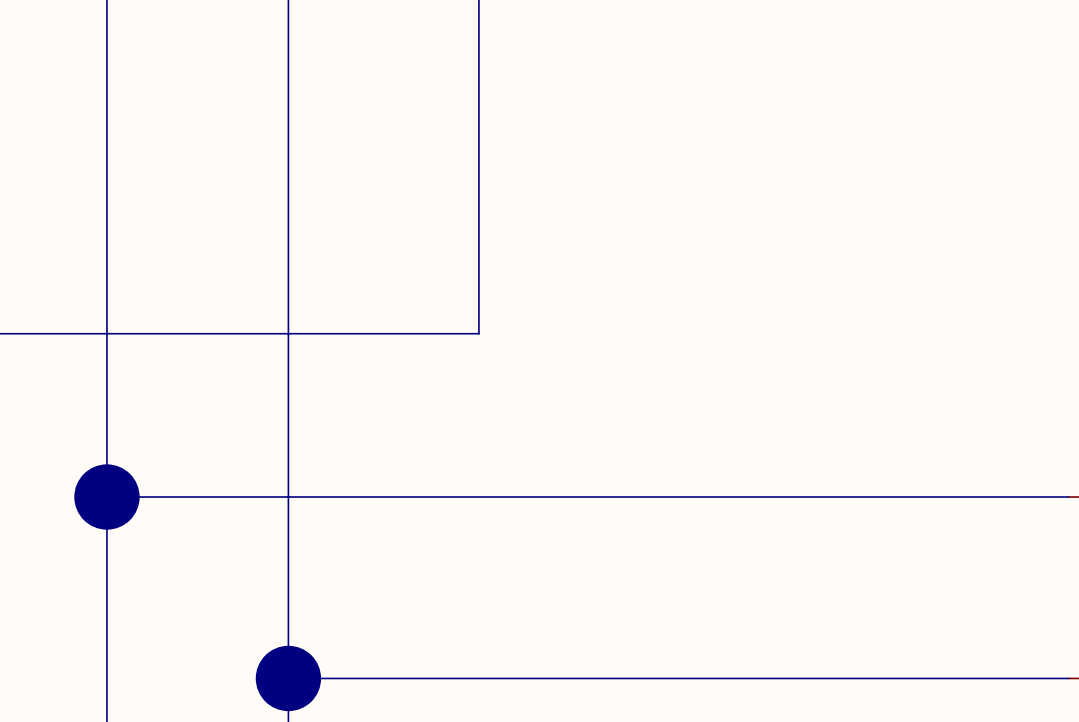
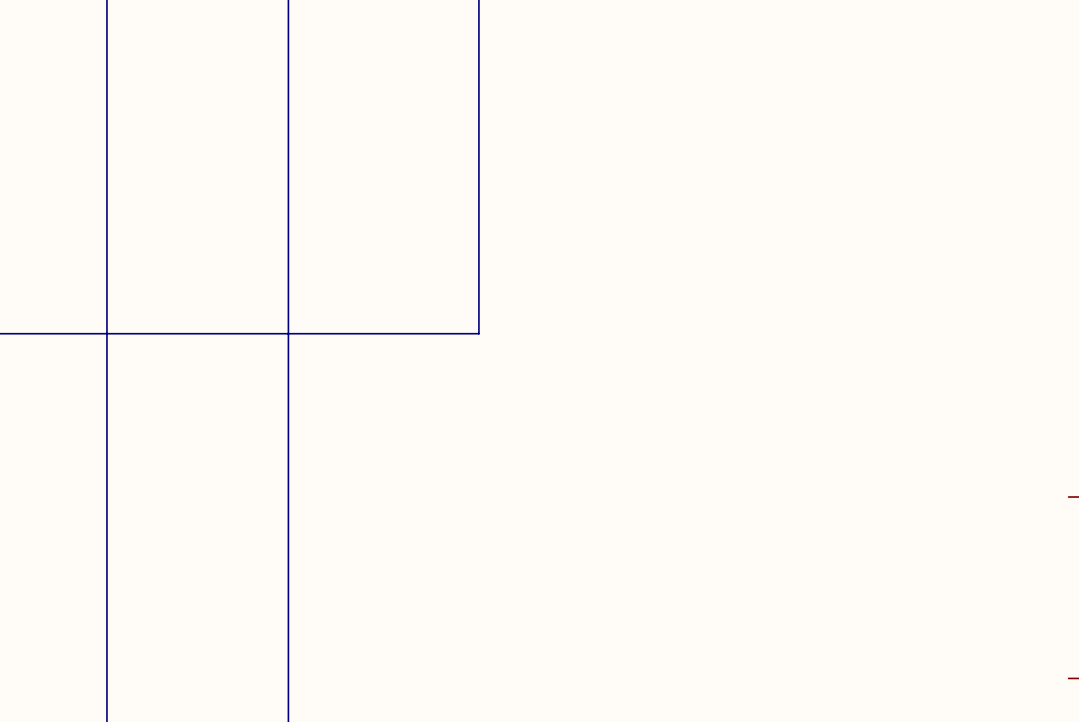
wire: (106, 497) (1068, 497) -> none
junction: (106, 497) -> none
wire: (288, 678) (1068, 678) -> none
junction: (288, 678) -> none

